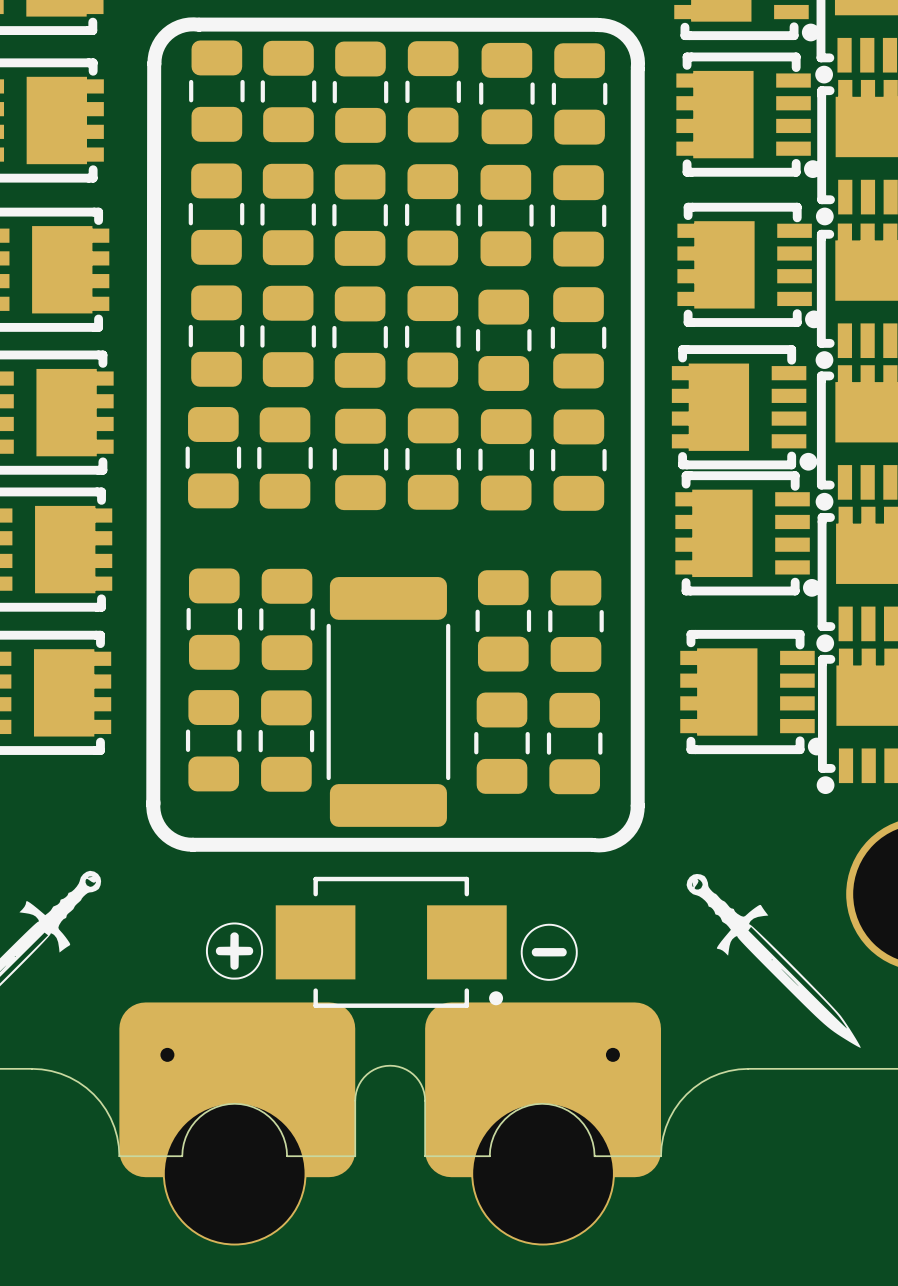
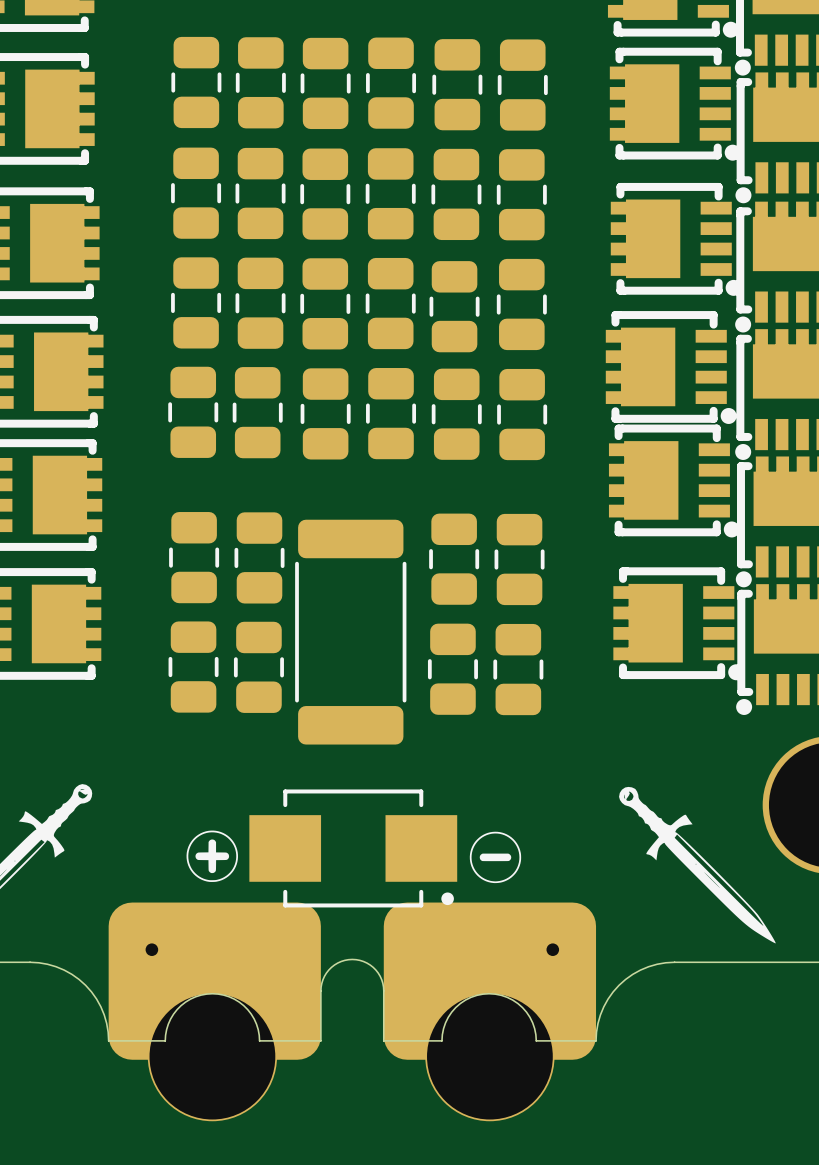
line: (198, 24) (179, 26) (167, 33) (158, 45) (154, 63) -> none
line: (199, 24) (597, 24) -> none
line: (598, 25) (616, 29) (628, 37) (636, 54) (637, 68) -> none
line: (154, 63) (153, 804) -> none
line: (637, 70) (637, 810) (633, 824) (625, 835) (613, 842) (594, 845) -> none
line: (153, 802) (156, 820) (163, 832) (174, 840) (188, 844) (592, 844) -> none

